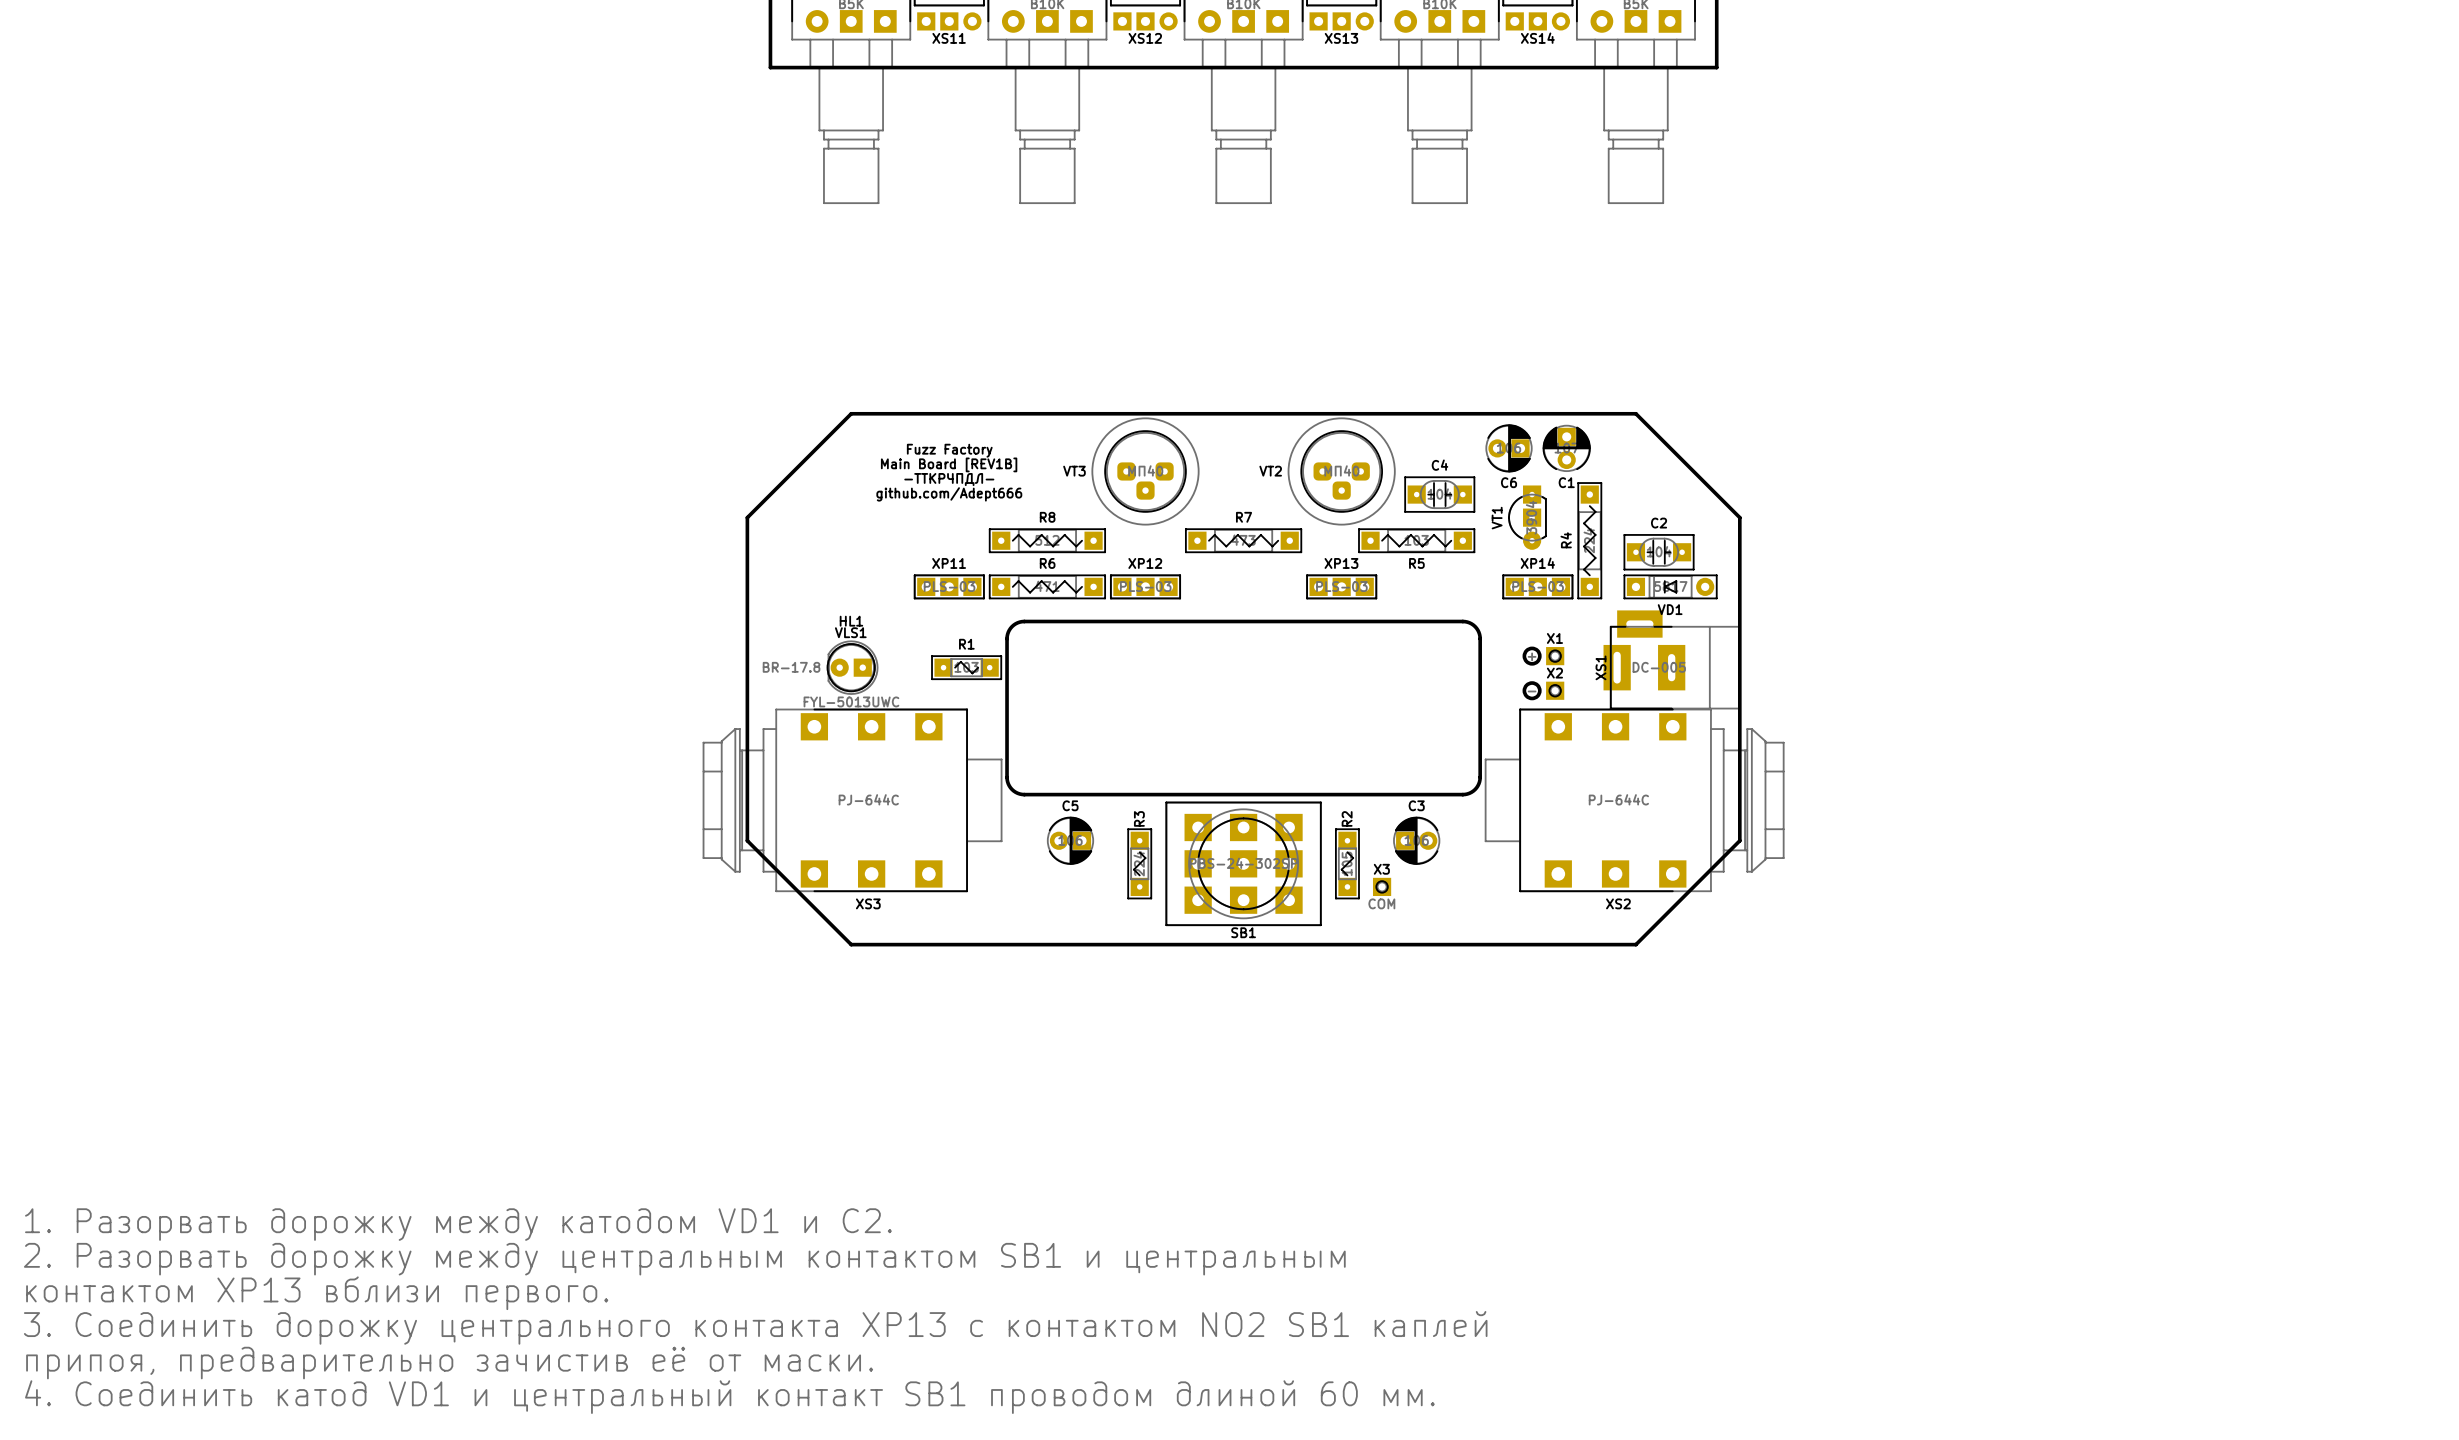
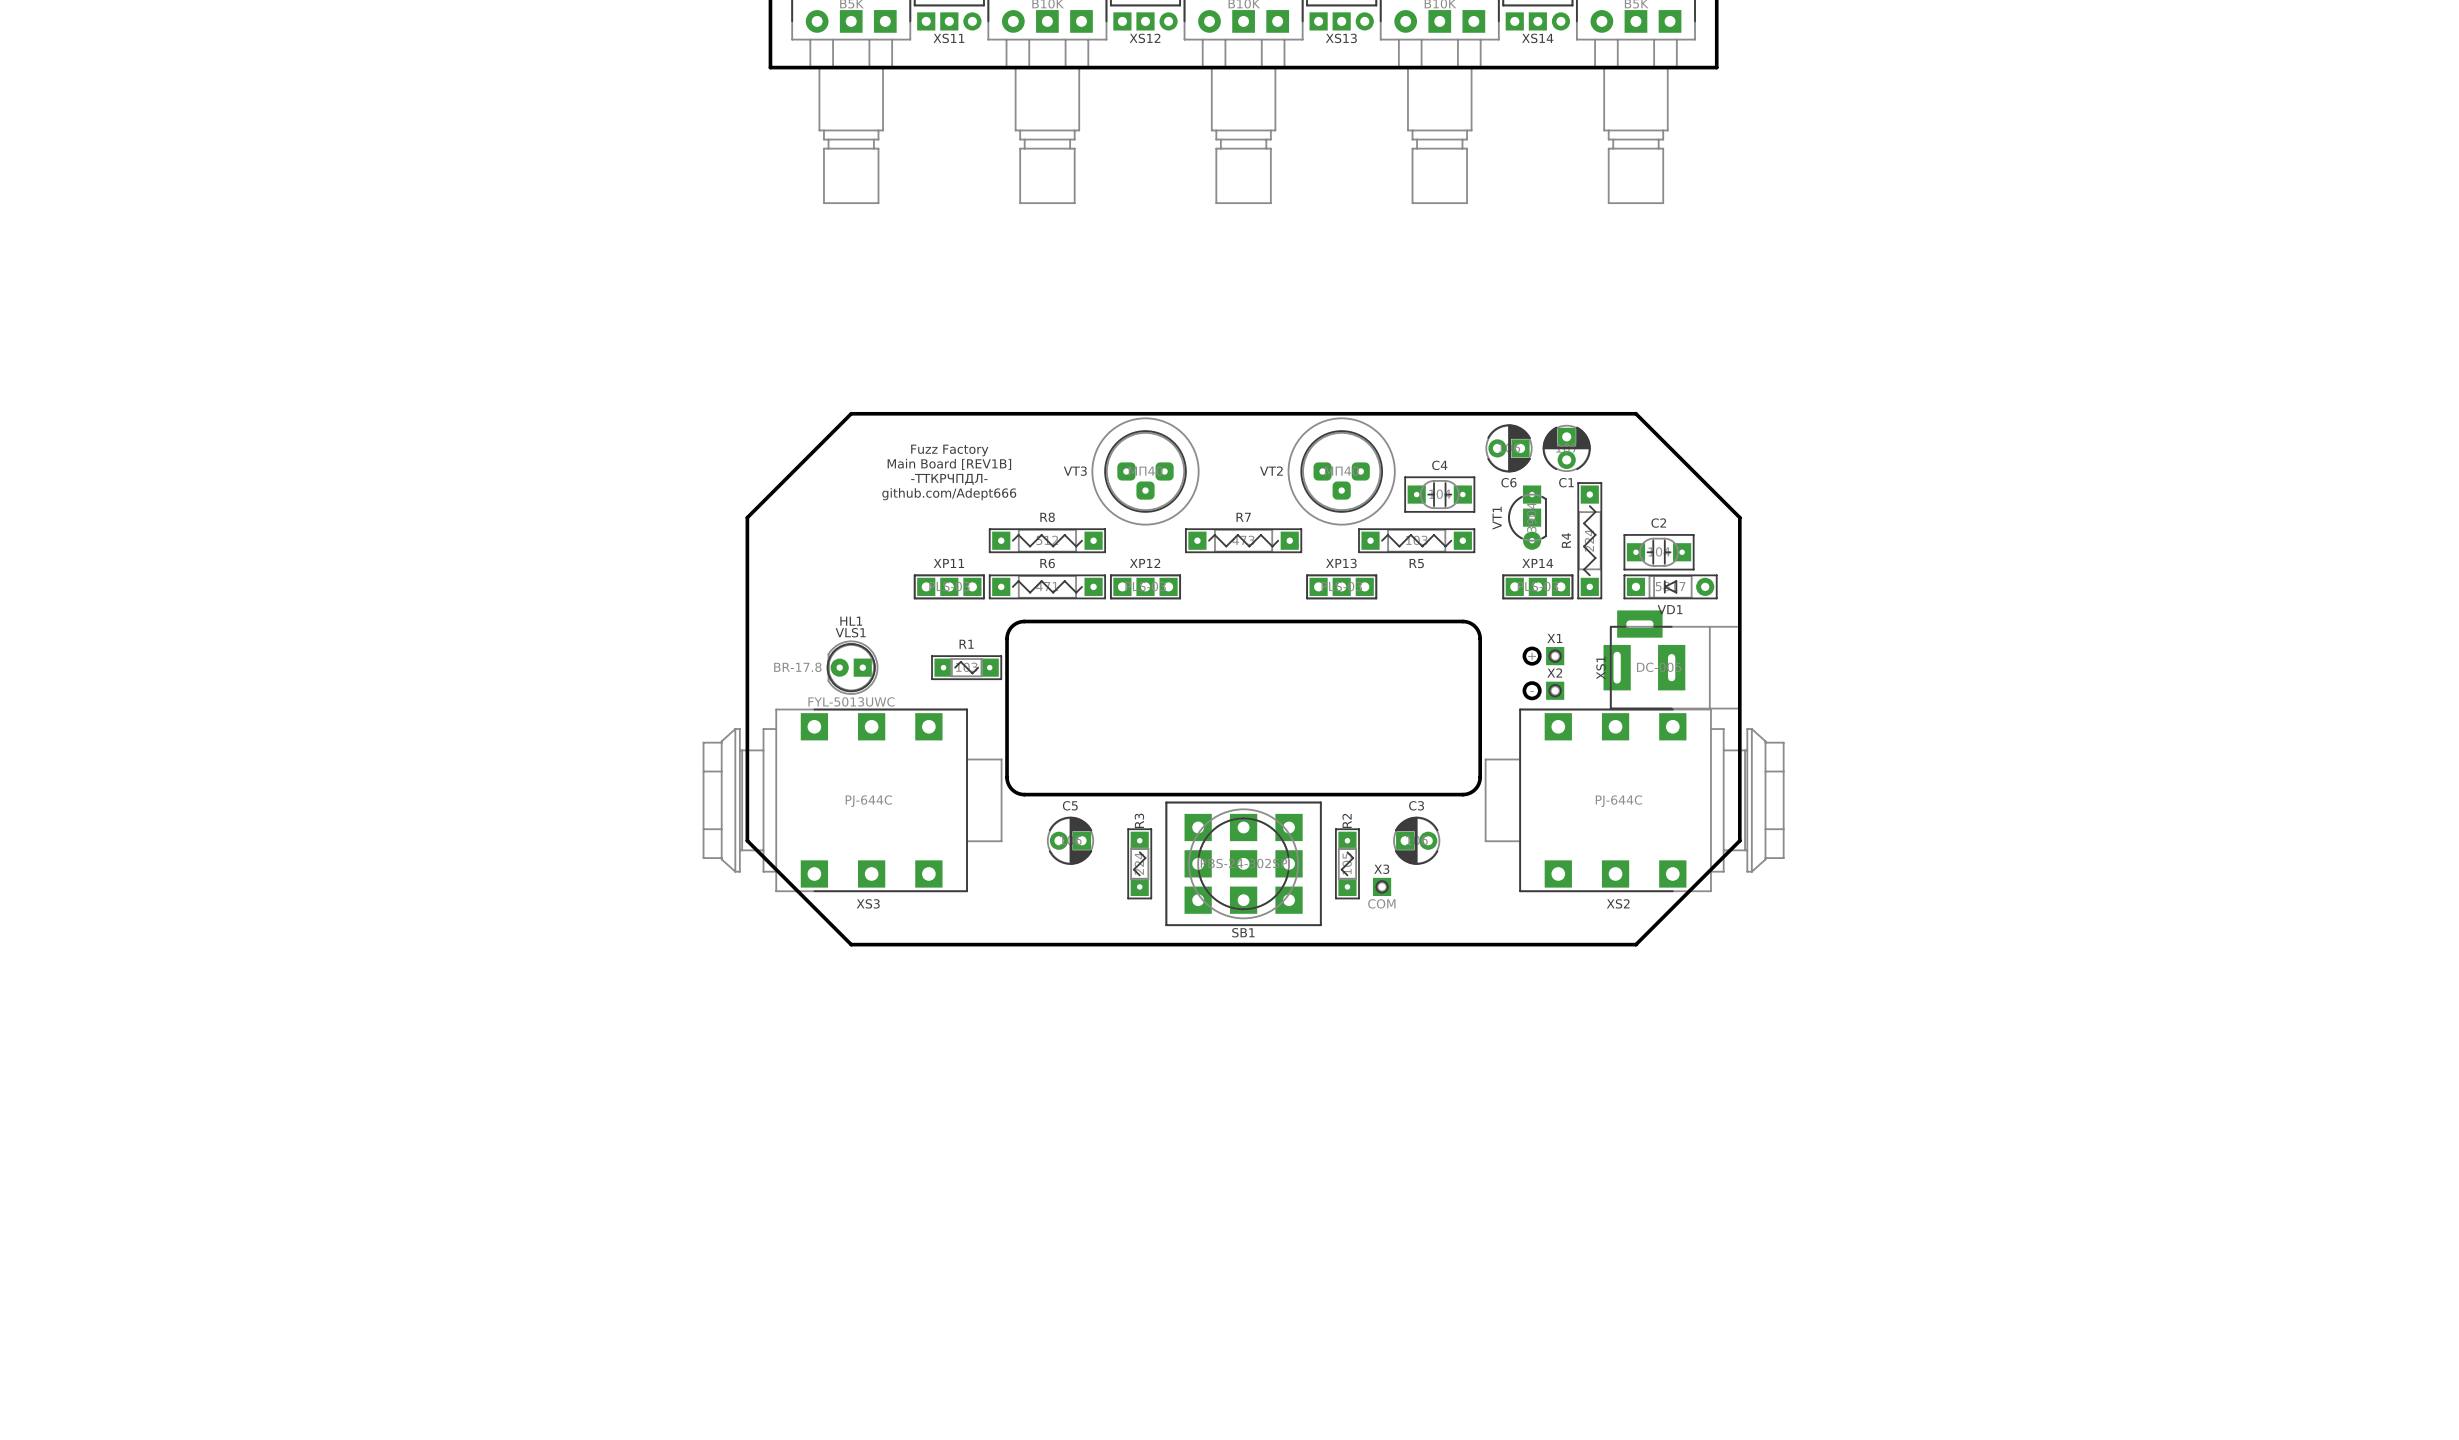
text: 1. Разорвать дорожку между катодом VD1 и C2. (458, 1224) -> none
text: 2. Разорвать дорожку между центральным контактом SB1 и центральным (684, 1259) -> none
text: контактом XP13 вблизи первого. (317, 1293) -> none
text: 3. Соединить дорожку центрального контакта XP13 с контактом NO2 SB1 каплей (755, 1327) -> none
text: припоя, предварительно зачистив её от маски. (449, 1363) -> none
text: 4. Соединить катод VD1 и центральный контакт SB1 проводом длиной 60 мм. (729, 1397) -> none

